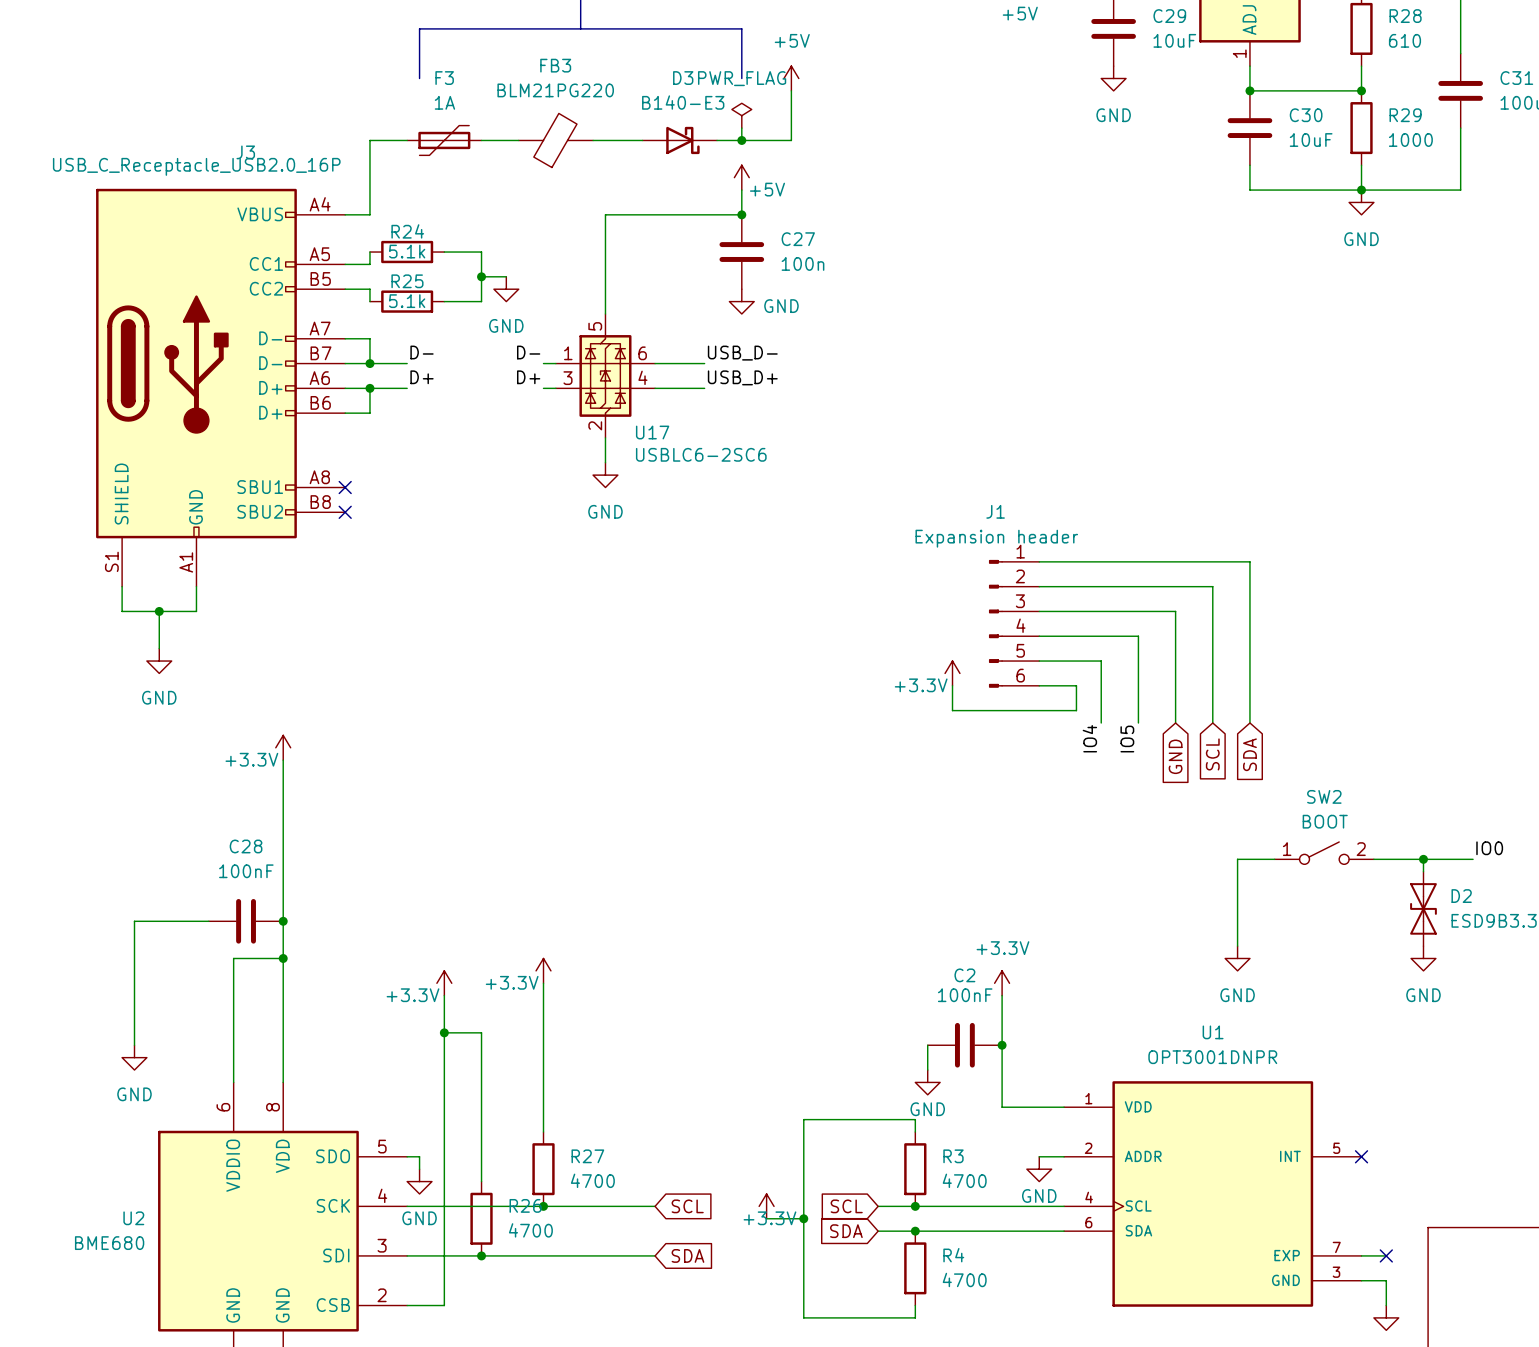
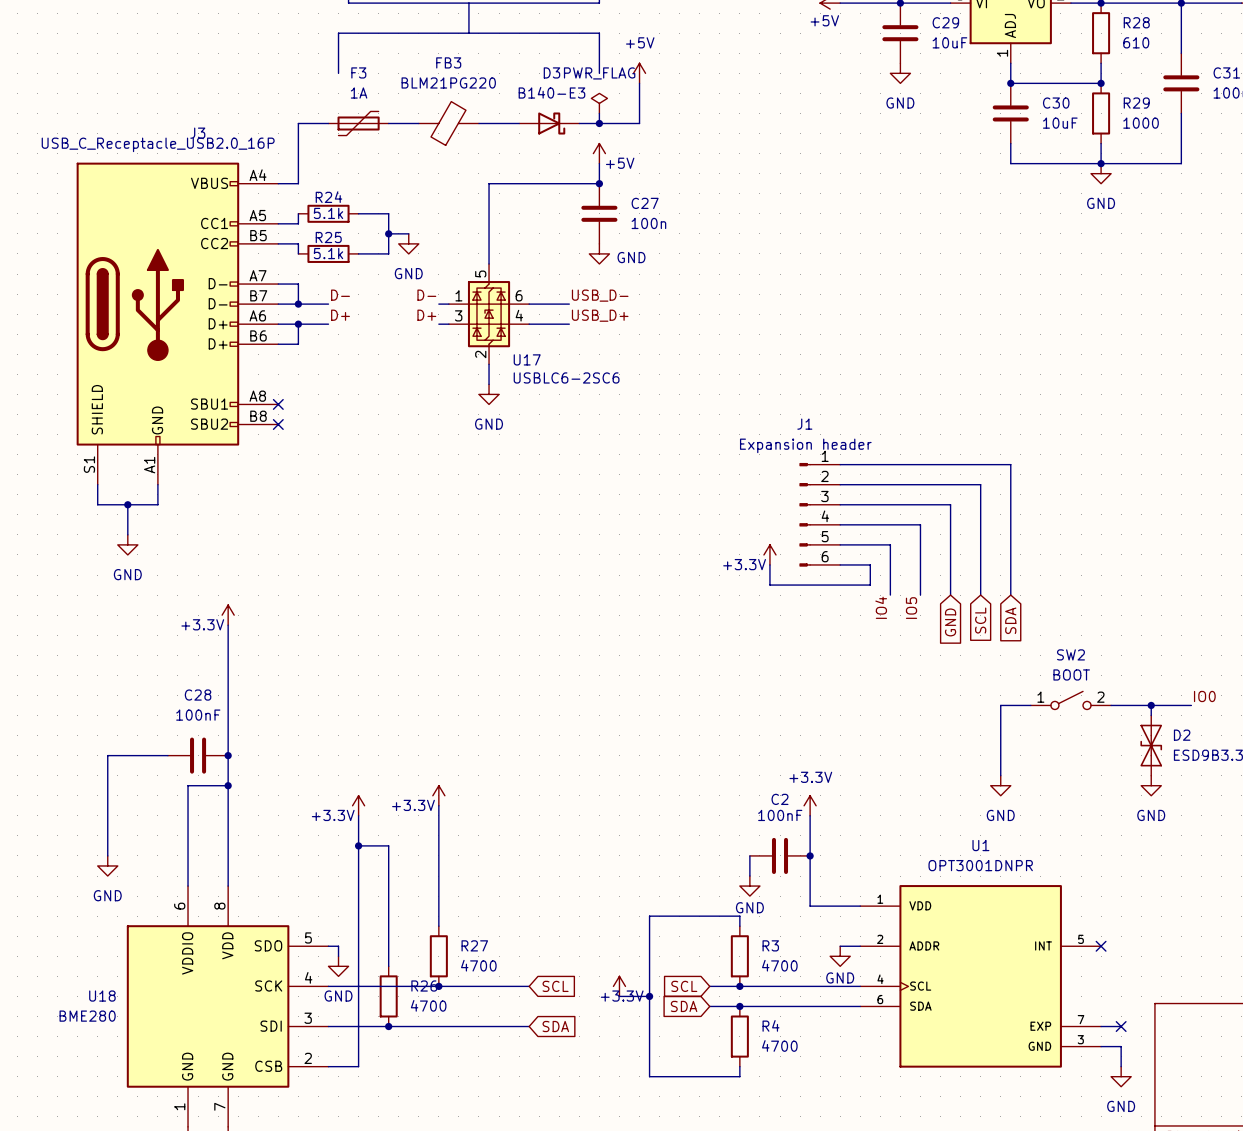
U2 name: U2 (133, 1218) -> U18 (102, 996)
U2 value: BME680 (109, 1243) -> BME280 (87, 1016)

